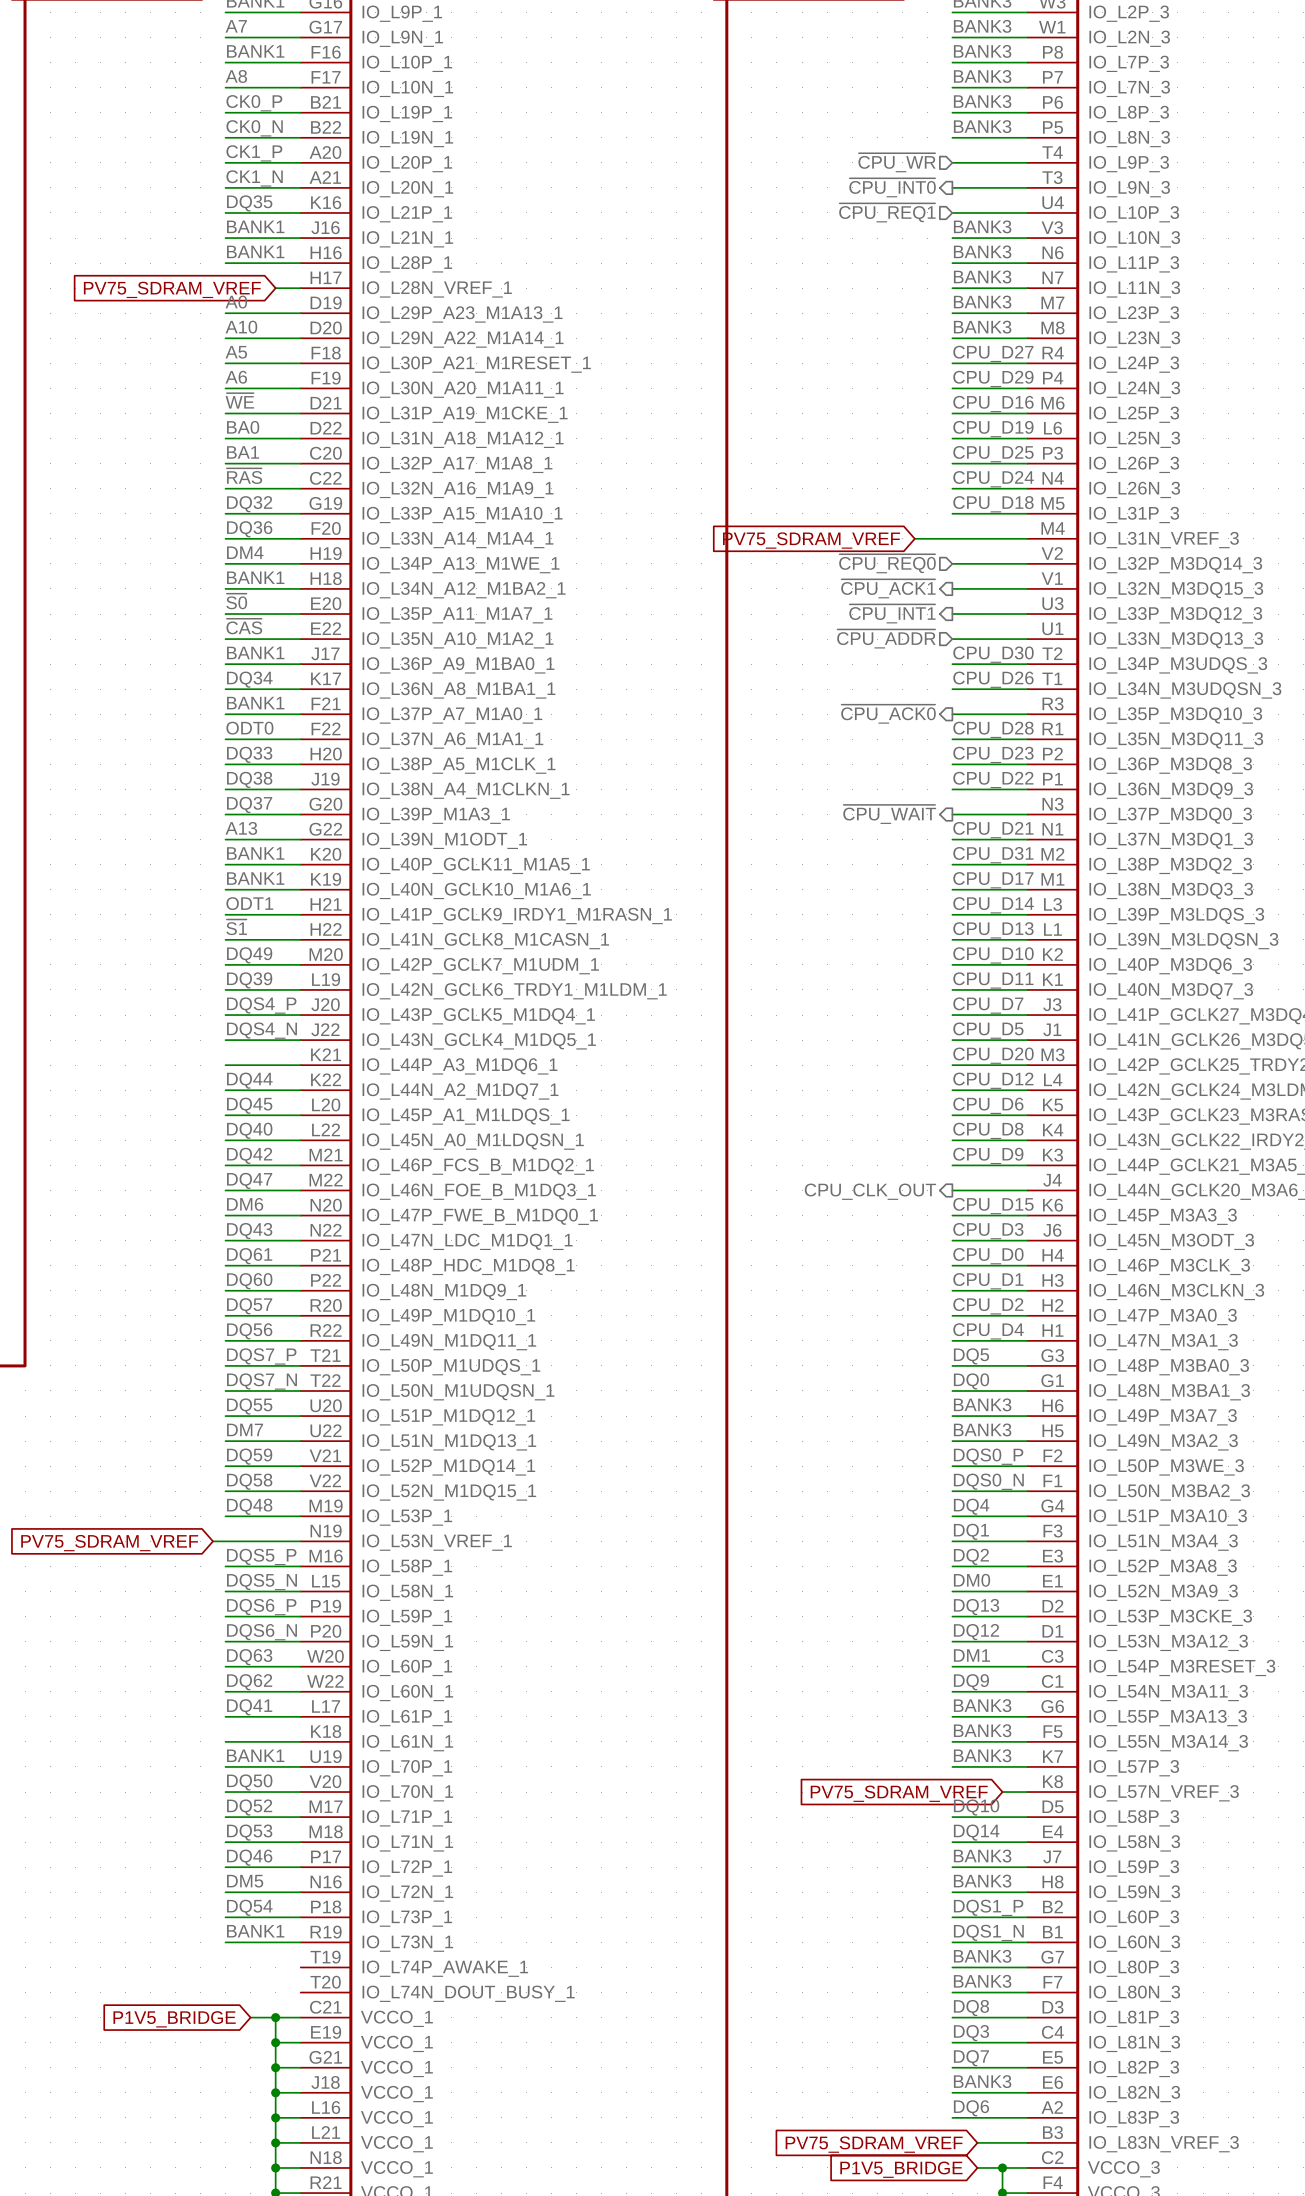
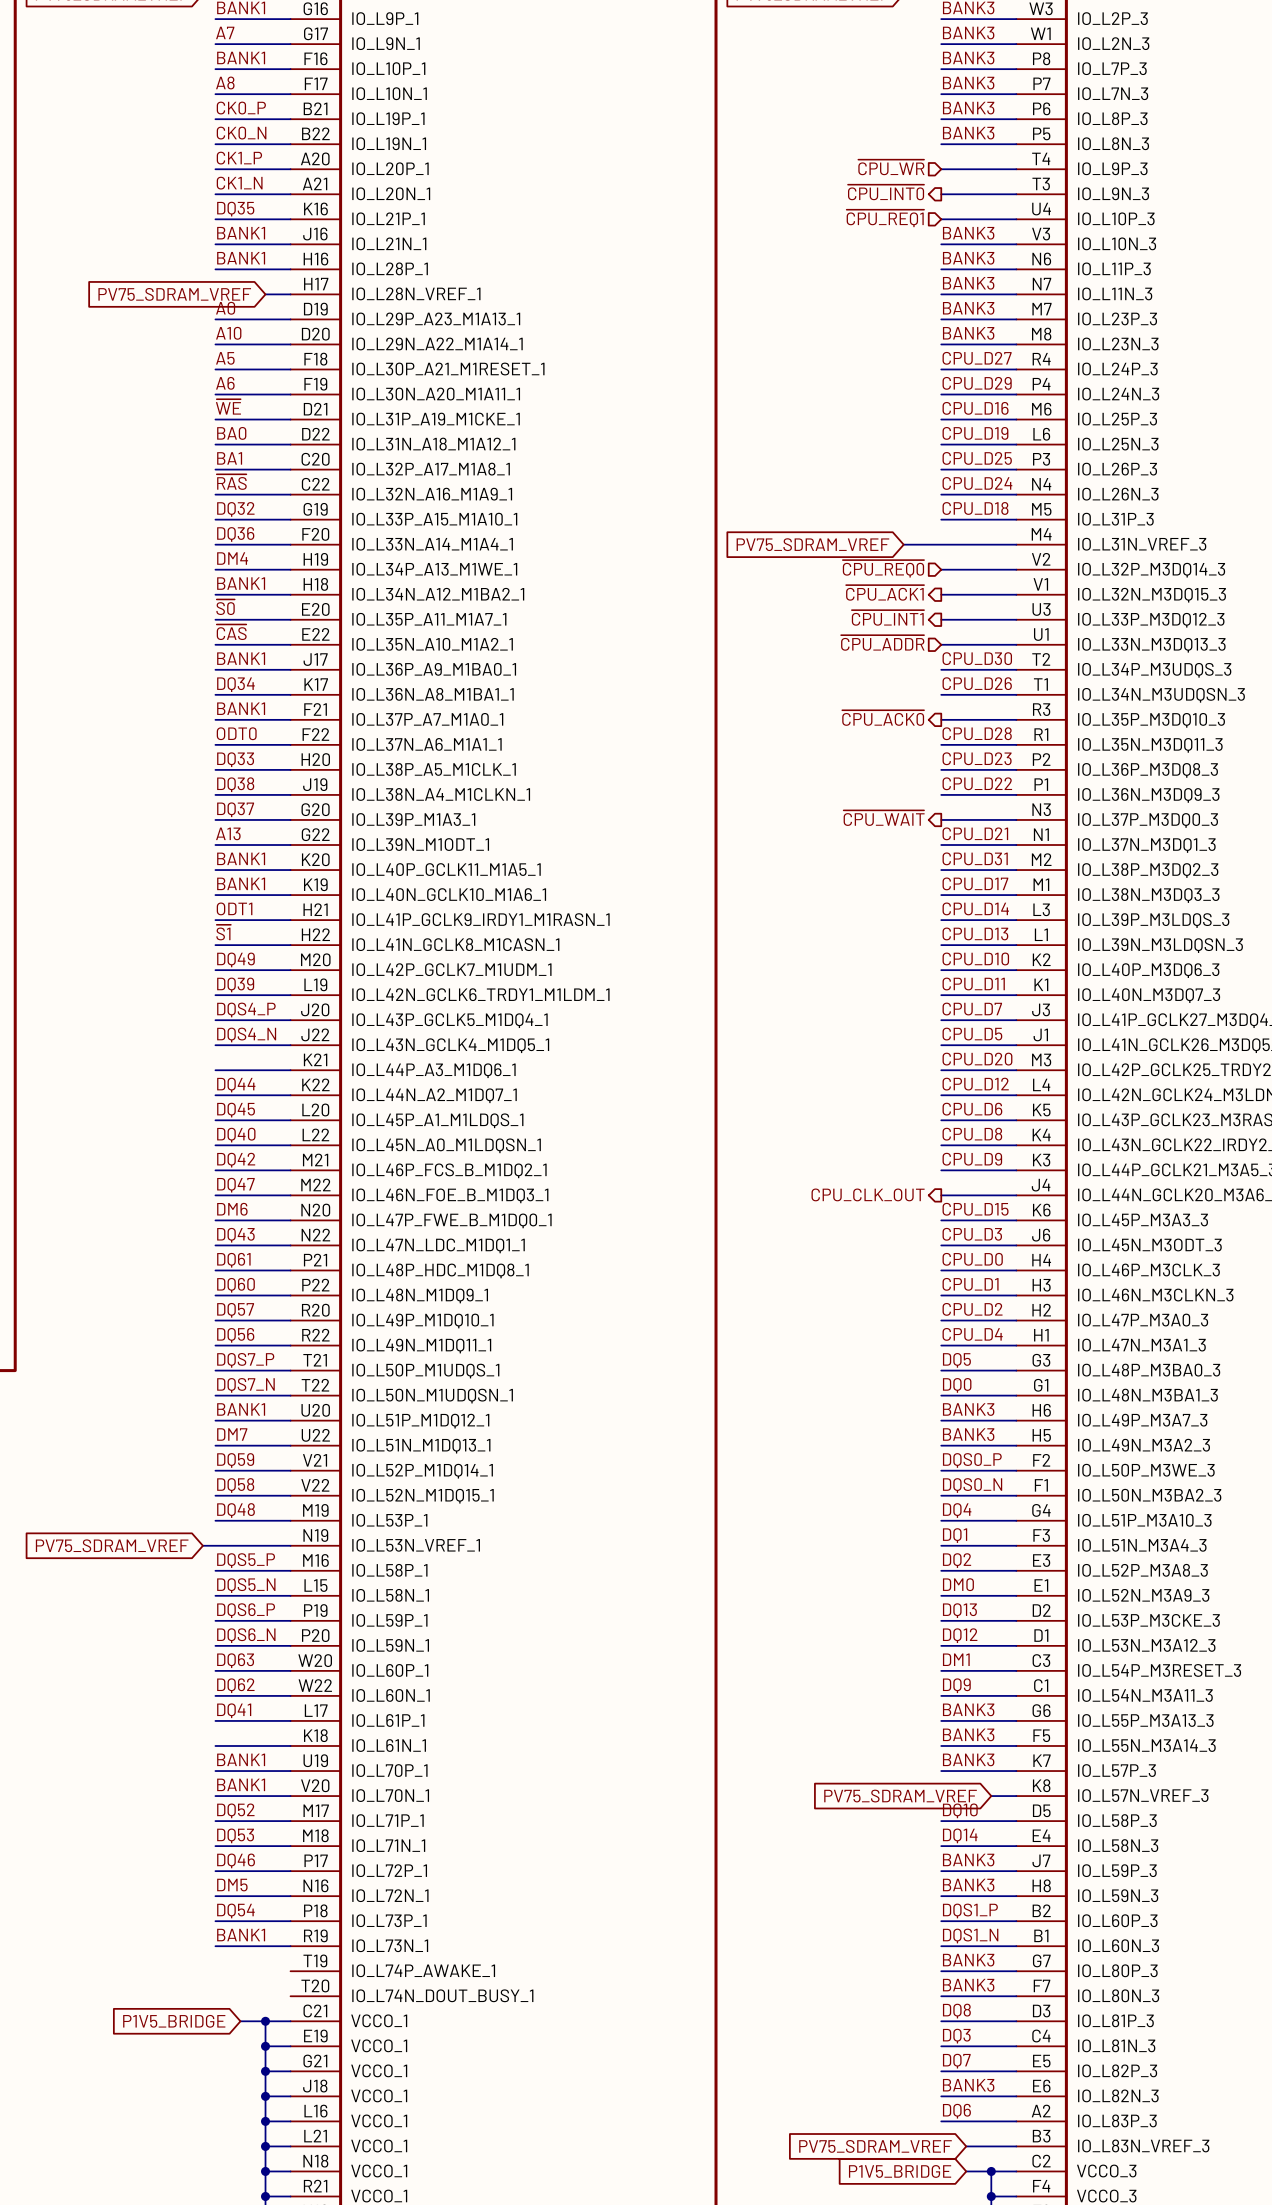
label: DQ55 (249, 1406) -> BANK1 (241, 1409)
label: DQ50 (249, 1782) -> BANK1 (241, 1784)

